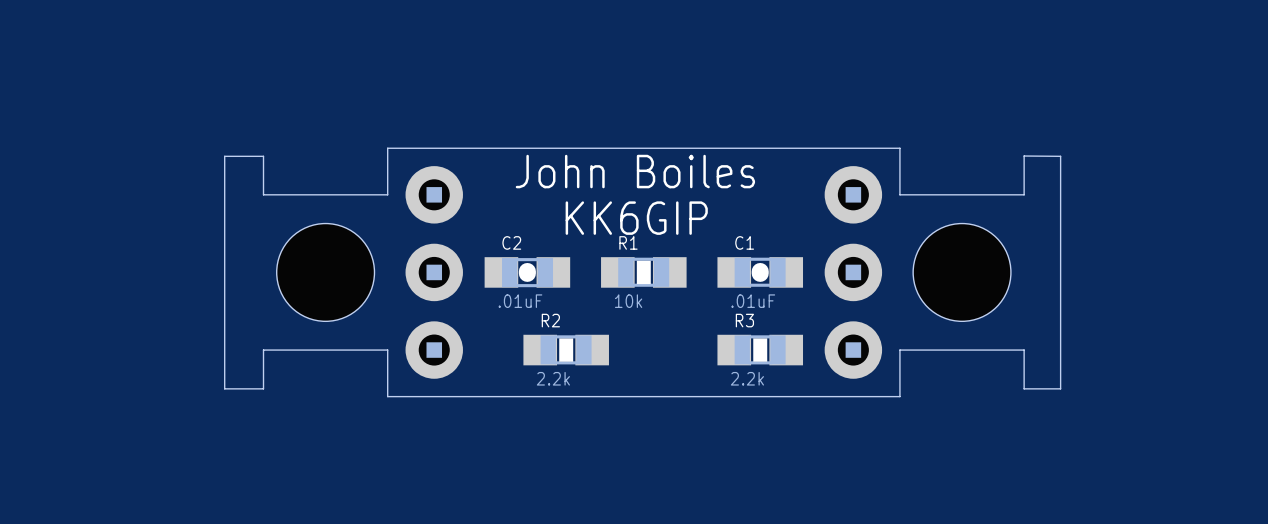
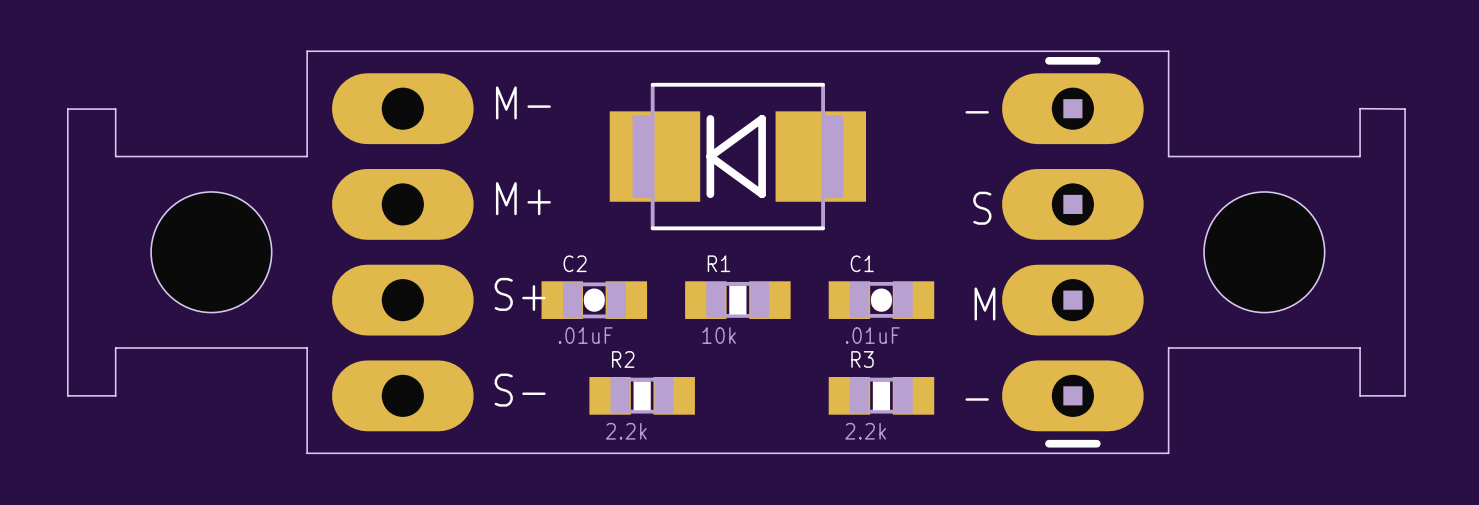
text: none -> M- (523, 102)
text: none -> - (977, 112)
part: none -> (402, 156)
part: none -> (737, 156)
text: John Boiles (635, 171) -> none
text: none -> M+ (523, 198)
text: none -> S (982, 208)
text: KK6GIP (636, 218) -> none
part: none -> (1072, 252)
text: none -> S+ (520, 294)
hole position: (325, 272) -> (211, 252)
part: (434, 272) -> none
part: (853, 272) -> none
hole position: (962, 272) -> (1264, 252)
text: none -> M (984, 303)
part: none -> (402, 347)
text: none -> S- (520, 390)
text: none -> - (977, 399)
board edge: (387, 396) (387, 350) (263, 350) (263, 388) (224, 388) (224, 156) (263, 156) (263, 194) (387, 194) (387, 148) (899, 148) (899, 194) (1024, 194) (1024, 156) (1060, 156) (1060, 388) (1024, 388) (1024, 350) (899, 350) (899, 396) -> (421, 453) (307, 453) (307, 347) (115, 347) (115, 395) (67, 395) (67, 109) (115, 109) (115, 156) (307, 156) (307, 51) (1168, 51) (1168, 156) (1360, 156) (1360, 108) (1405, 109) (1405, 395) (1360, 395) (1360, 347) (1168, 347) (1168, 453) (1053, 453)

